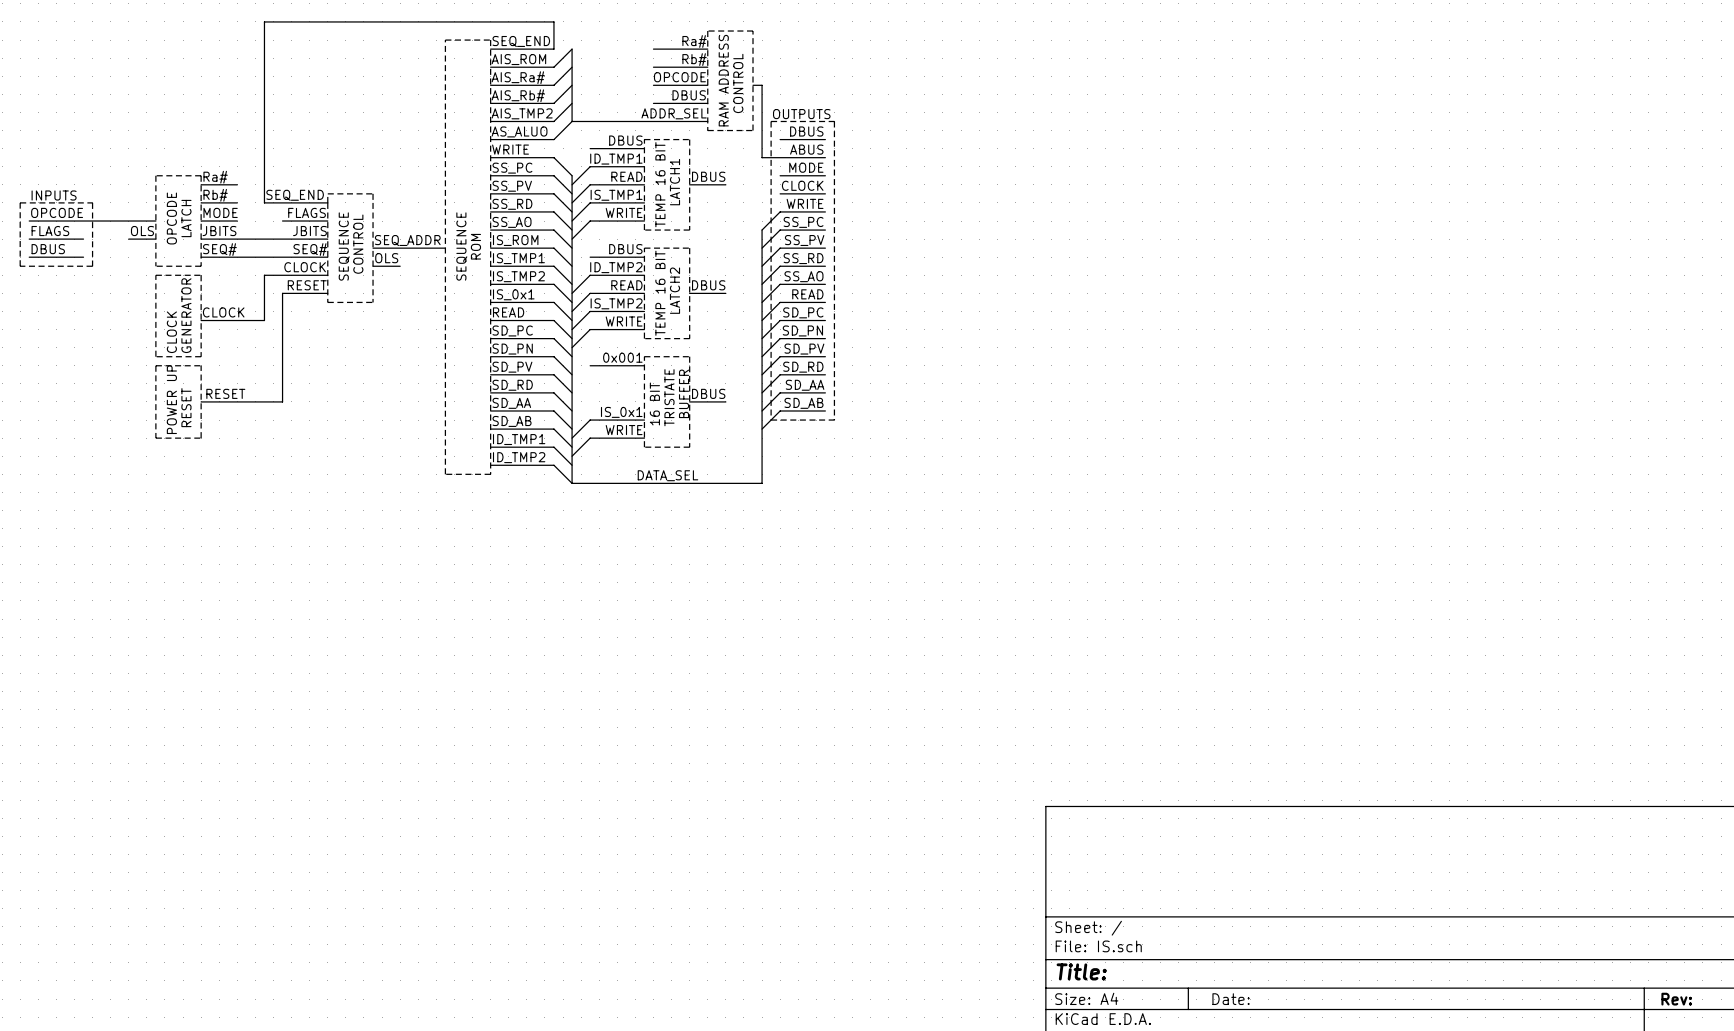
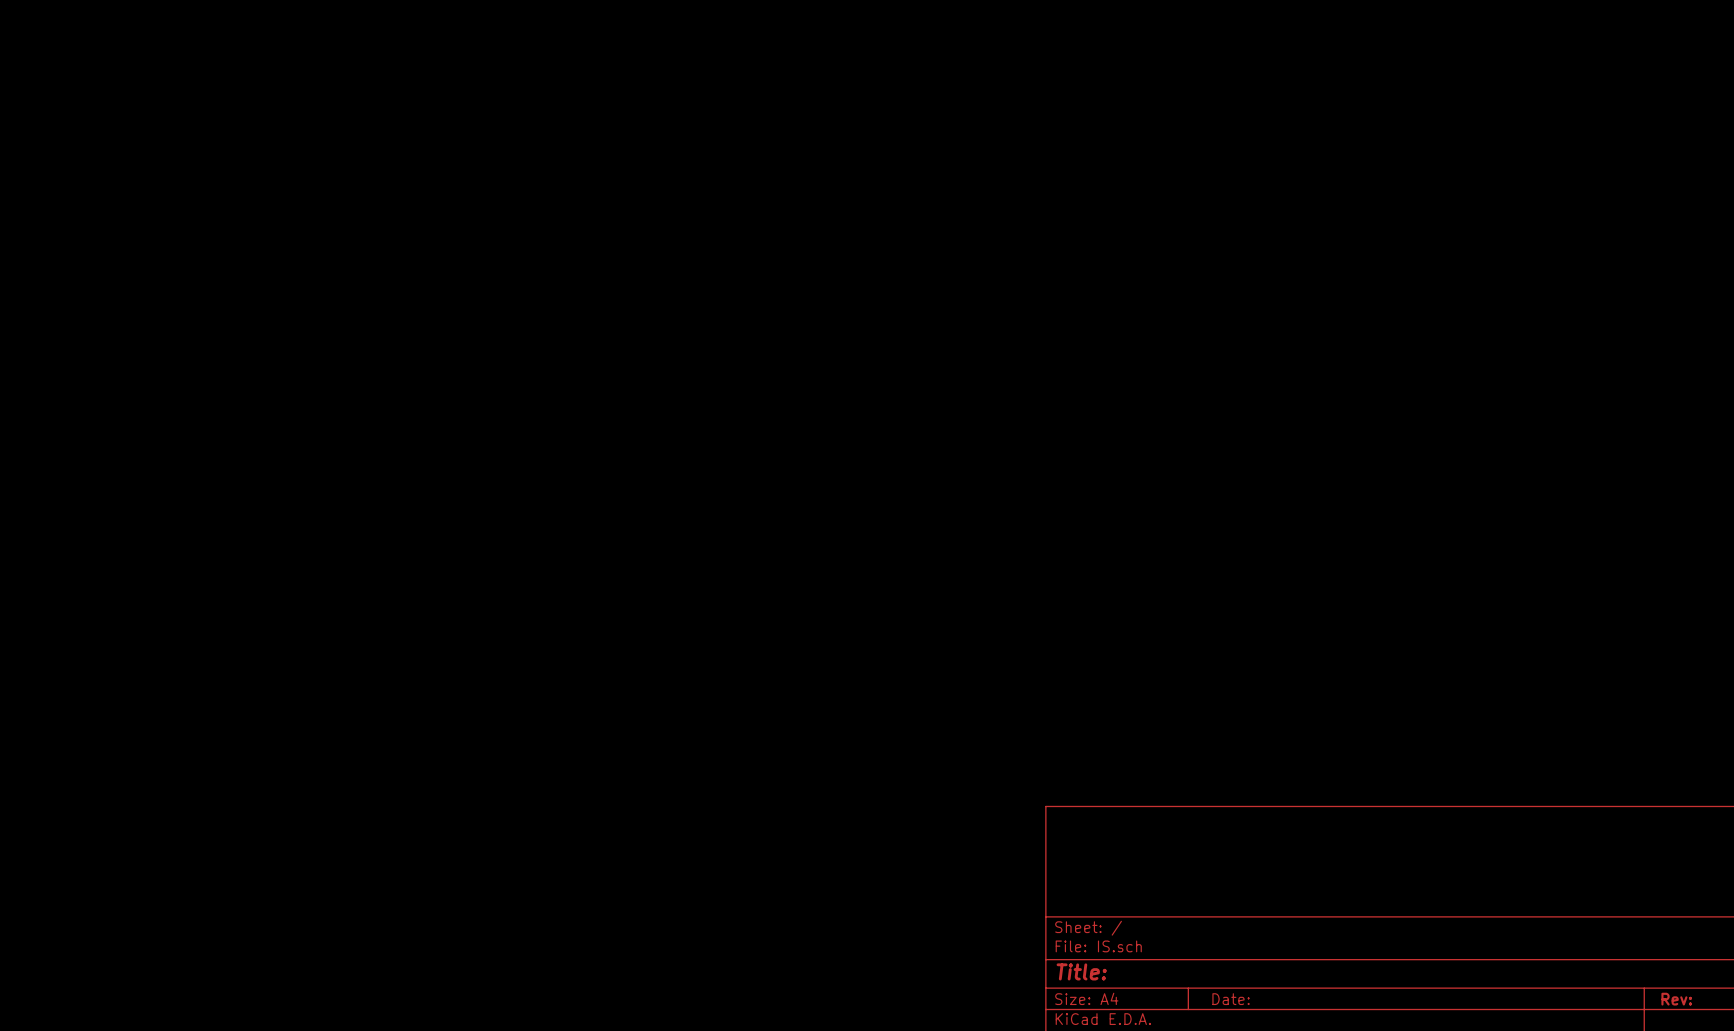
line: (707, 31) (707, 130) (753, 130) (753, 31) (707, 31) -> none
line: (445, 40) (445, 474) (490, 474) (490, 40) (445, 40) -> none
label: SEQ_END (521, 41) -> none
label: Ra# (694, 41) -> none
wire: (490, 49) (553, 49) (553, 21) (264, 21) (264, 202) (327, 202) -> none
bus: (572, 49) (572, 121) (707, 121) -> none
wire: (572, 49) (553, 67) (490, 67) -> none
bus: (653, 49) (707, 49) -> none
label: AIS_ROM (518, 59) -> none
label: Rb# (694, 59) -> none
wire: (572, 67) (553, 85) (490, 85) -> none
bus: (653, 67) (707, 67) -> none
label: AIS_Ra# (518, 77) -> none
label: OPCODE (679, 77) -> none
text: RAM ADDRESS (723, 80) -> none
text: CONTROL (738, 83) -> none
wire: (572, 85) (553, 103) (490, 103) -> none
bus: (653, 85) (707, 85) -> none
bus: (753, 85) (762, 85) (762, 157) (825, 157) -> none
label: AIS_Rb# (518, 95) -> none
label: DBUS (689, 95) -> none
wire: (572, 103) (553, 121) (490, 121) -> none
bus: (653, 103) (707, 103) -> none
label: AIS_TMP2 (522, 113) -> none
label: ADDR_SEL (674, 113) -> none
text: OUTPUTS (801, 114) -> none
wire: (572, 121) (553, 139) (490, 139) -> none
line: (771, 121) (771, 420) (834, 420) (834, 121) (771, 121) -> none
label: AS_ALUO (519, 131) -> none
label: DBUS (806, 131) -> none
line: (644, 139) (689, 139) (689, 230) (644, 230) (644, 139) -> none
bus: (780, 139) (825, 139) -> none
label: DBUS (625, 140) -> none
bus: (590, 148) (644, 148) -> none
label: WRITE (510, 149) -> none
label: ABUS (806, 149) -> none
wire: (490, 157) (553, 157) (572, 175) -> none
label: ID_TMP1 (616, 159) -> none
wire: (644, 166) (590, 166) (572, 184) -> none
label: MODE (806, 167) -> none
label: SS_PC (512, 168) -> none
line: (155, 175) (201, 175) (201, 266) (155, 266) (155, 175) -> none
wire: (490, 175) (553, 175) (572, 193) -> none
bus: (572, 175) (572, 483) (762, 483) (762, 230) -> none
bus: (780, 175) (825, 175) -> none
label: READ (626, 176) -> none
label: DBUS (708, 176) -> none
label: Ra# (215, 177) -> none
text: LATCH1 (674, 182) -> none
bus: (201, 184) (237, 184) -> none
wire: (644, 184) (590, 184) (572, 202) -> none
text: TEMP 16 BIT (660, 184) -> none
bus: (689, 184) (725, 184) -> none
label: CLOCK (802, 185) -> none
label: SS_PV (512, 186) -> none
line: (327, 193) (327, 302) (373, 302) (373, 193) (327, 193) -> none
wire: (490, 193) (553, 193) (572, 211) -> none
wire: (780, 193) (825, 193) -> none
text: INPUTS (54, 195) -> none
label: Rb# (215, 195) -> none
label: SEQ_END (295, 195) -> none
label: IS_TMP1 (616, 195) -> none
line: (20, 202) (92, 202) (92, 266) (20, 266) (20, 202) -> none
bus: (201, 202) (237, 202) -> none
wire: (644, 202) (590, 202) (572, 221) -> none
label: WRITE (805, 203) -> none
label: SS_RD (512, 204) -> none
wire: (490, 211) (553, 211) (572, 230) -> none
wire: (825, 211) (780, 211) (762, 230) -> none
label: OPCODE (57, 212) -> none
label: MODE (220, 212) -> none
label: FLAGS (307, 212) -> none
label: WRITE (624, 212) -> none
text: OPCODE (171, 218) -> none
text: LATCH (186, 218) -> none
bus: (29, 221) (155, 221) -> none
bus: (201, 221) (237, 221) -> none
bus: (282, 221) (327, 221) -> none
wire: (644, 221) (590, 221) (572, 239) -> none
label: SS_AO (512, 222) -> none
label: SS_PC (803, 222) -> none
wire: (490, 230) (553, 230) (572, 248) -> none
wire: (825, 230) (780, 230) (762, 248) -> none
label: FLAGS (50, 231) -> none
label: OLS (142, 231) -> none
label: JBITS (219, 231) -> none
label: JBITS (309, 231) -> none
bus: (29, 239) (83, 239) -> none
wire: (128, 239) (155, 239) -> none
bus: (201, 239) (327, 239) -> none
label: SEQ_ADDR (407, 240) -> none
label: IS_ROM (515, 240) -> none
label: SS_PV (804, 240) -> none
text: CONTROL (358, 244) -> none
text: SEQUENCE (344, 246) -> none
text: SEQUENCE (461, 246) -> none
text: ROM (475, 246) -> none
bus: (373, 248) (445, 248) -> none
wire: (490, 248) (553, 248) (572, 266) -> none
line: (644, 248) (644, 338) (689, 338) (689, 248) (644, 248) -> none
wire: (825, 248) (780, 248) (762, 266) -> none
label: DBUS (48, 249) -> none
label: SEQ# (219, 249) -> none
label: SEQ# (310, 249) -> none
label: DBUS (625, 249) -> none
bus: (29, 257) (83, 257) -> none
bus: (201, 257) (327, 257) -> none
bus: (590, 257) (644, 257) -> none
label: OLS (386, 258) -> none
label: IS_TMP1 (518, 258) -> none
label: SS_RD (803, 258) -> none
wire: (373, 266) (400, 266) -> none
wire: (490, 266) (553, 266) (572, 284) -> none
wire: (825, 266) (780, 266) (762, 284) -> none
label: CLOCK (305, 267) -> none
label: ID_TMP2 (616, 267) -> none
line: (155, 275) (155, 356) (201, 356) (201, 275) (155, 275) -> none
wire: (327, 275) (264, 275) (264, 320) (201, 320) -> none
wire: (644, 275) (590, 275) (572, 293) -> none
label: IS_TMP2 (518, 276) -> none
label: SS_AO (803, 276) -> none
wire: (490, 284) (553, 284) (572, 302) -> none
wire: (825, 284) (780, 284) (762, 302) -> none
label: RESET (307, 285) -> none
label: READ (626, 285) -> none
label: DBUS (708, 285) -> none
text: LATCH2 (674, 290) -> none
wire: (327, 293) (282, 293) (282, 401) (201, 401) -> none
wire: (644, 293) (590, 293) (572, 311) -> none
text: TEMP 16 BIT (660, 293) -> none
bus: (689, 293) (725, 293) -> none
label: IS_0x1 (513, 294) -> none
label: READ (807, 294) -> none
wire: (490, 302) (553, 302) (572, 320) -> none
wire: (825, 302) (780, 302) (762, 320) -> none
label: IS_TMP2 (616, 303) -> none
wire: (644, 311) (590, 311) (572, 329) -> none
label: CLOCK (223, 312) -> none
label: READ (508, 312) -> none
label: SD_PC (803, 312) -> none
text: GENERATOR (186, 315) -> none
wire: (490, 320) (553, 320) (572, 338) -> none
wire: (825, 320) (780, 320) (762, 338) -> none
label: WRITE (624, 321) -> none
wire: (644, 329) (590, 329) (572, 347) -> none
label: SD_PC (512, 330) -> none
label: SD_PN (802, 330) -> none
text: CLOCK (171, 332) -> none
wire: (490, 338) (553, 338) (572, 356) -> none
wire: (825, 338) (780, 338) (762, 356) -> none
label: SD_PN (512, 349) -> none
label: SD_PV (804, 349) -> none
wire: (490, 356) (553, 356) (572, 374) -> none
line: (644, 356) (644, 447) (689, 447) (689, 356) (644, 356) -> none
wire: (825, 356) (780, 356) (762, 374) -> none
label: 0x001 (622, 357) -> none
line: (155, 365) (155, 438) (201, 438) (201, 365) (155, 365) -> none
bus: (590, 365) (644, 365) -> none
label: SD_PV (512, 367) -> none
label: SD_RD (803, 367) -> none
wire: (490, 374) (553, 374) (572, 392) -> none
wire: (825, 374) (780, 374) (762, 392) -> none
label: SD_RD (512, 385) -> none
label: SD_AA (805, 385) -> none
wire: (490, 392) (553, 392) (572, 410) -> none
wire: (825, 392) (780, 392) (762, 410) -> none
label: RESET (225, 393) -> none
text: BUFFER (684, 393) -> none
label: DBUS (708, 393) -> none
text: TRISTATE (669, 397) -> none
text: POWER UP (171, 399) -> none
bus: (689, 401) (725, 401) -> none
label: SD_AA (511, 403) -> none
text: 16 BIT (654, 403) -> none
label: SD_AB (803, 403) -> none
text: RESET (186, 407) -> none
wire: (490, 410) (553, 410) (572, 429) -> none
wire: (825, 410) (780, 410) (762, 429) -> none
label: IS_0x1 (621, 412) -> none
wire: (644, 420) (590, 420) (572, 438) -> none
label: SD_AB (512, 421) -> none
wire: (490, 429) (553, 429) (572, 447) -> none
label: WRITE (624, 430) -> none
wire: (644, 438) (590, 438) (572, 456) -> none
label: ID_TMP1 (519, 439) -> none
wire: (490, 447) (553, 447) (572, 465) -> none
label: ID_TMP2 (519, 457) -> none
wire: (490, 465) (553, 465) (572, 483) -> none
label: DATA_SEL (667, 475) -> none

